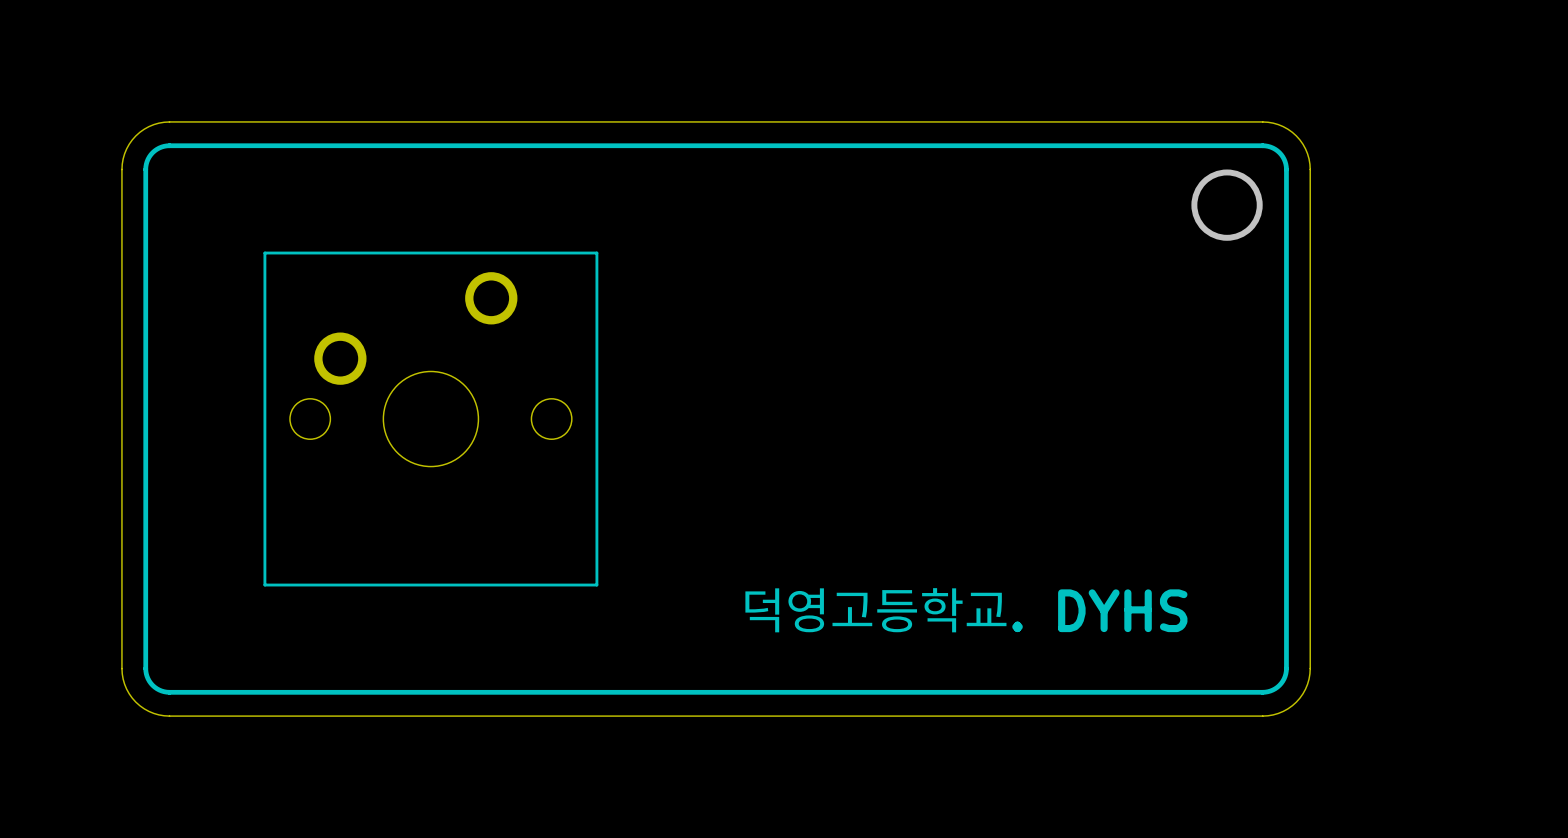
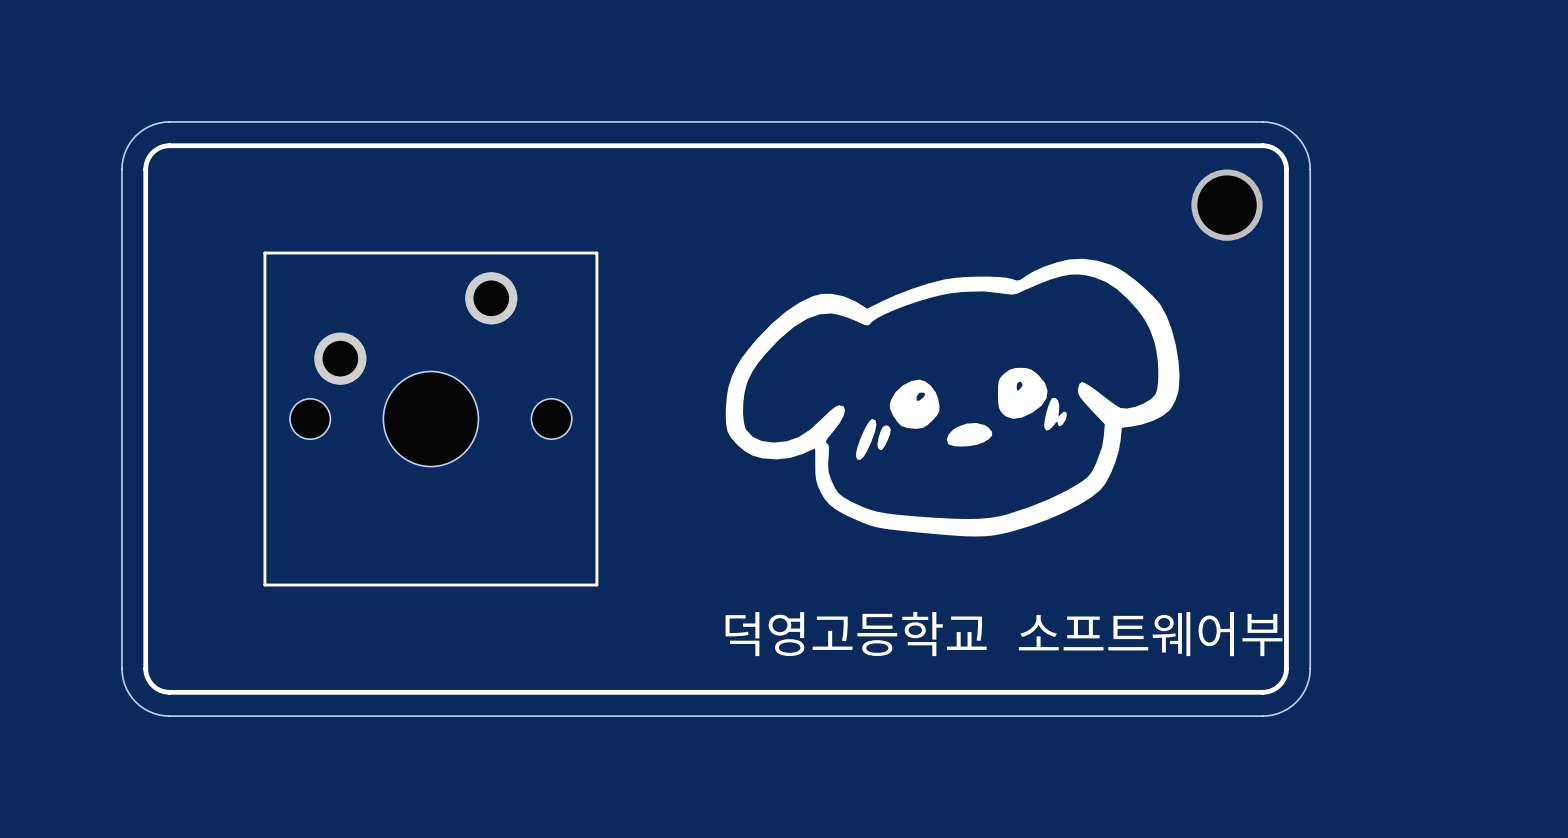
drawing: none -> [725, 258, 1180, 537]
text: 덕영고등학교. DYHS (964, 610) -> none
text: none -> 덕영고등학교 소프트웨어부 (1004, 634)

